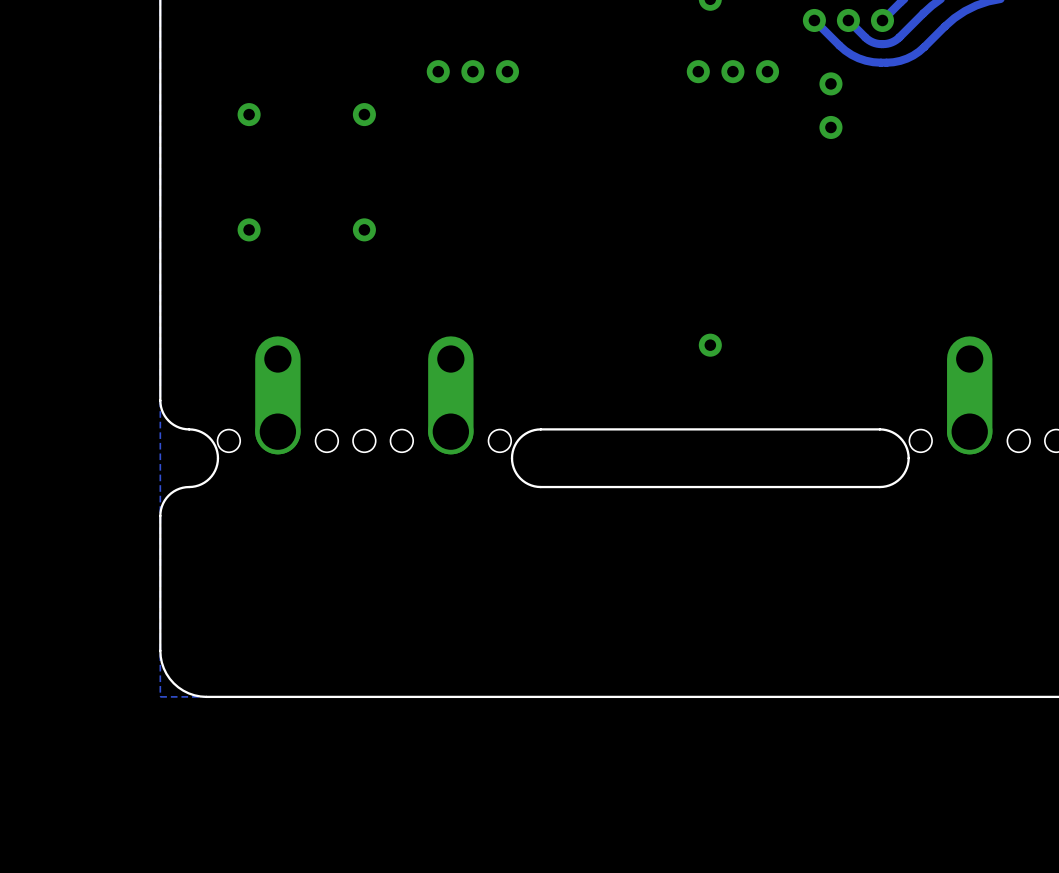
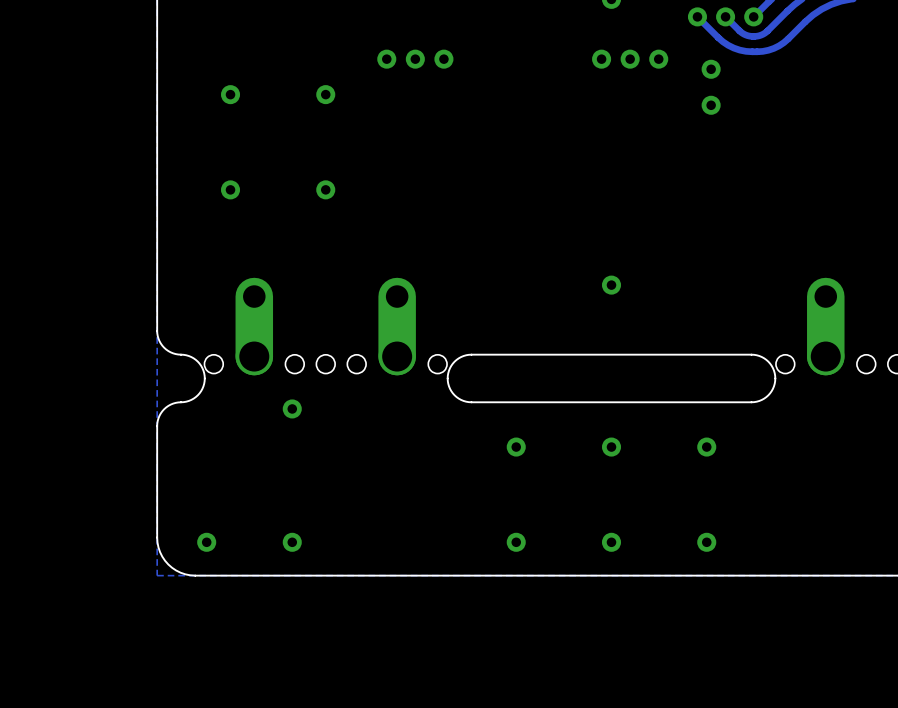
via: none -> (292, 408)
via: none -> (516, 447)
via: none -> (611, 447)
via: none -> (706, 447)
via: none -> (206, 542)
via: none -> (292, 542)
via: none -> (516, 542)
via: none -> (611, 542)
via: none -> (706, 542)

